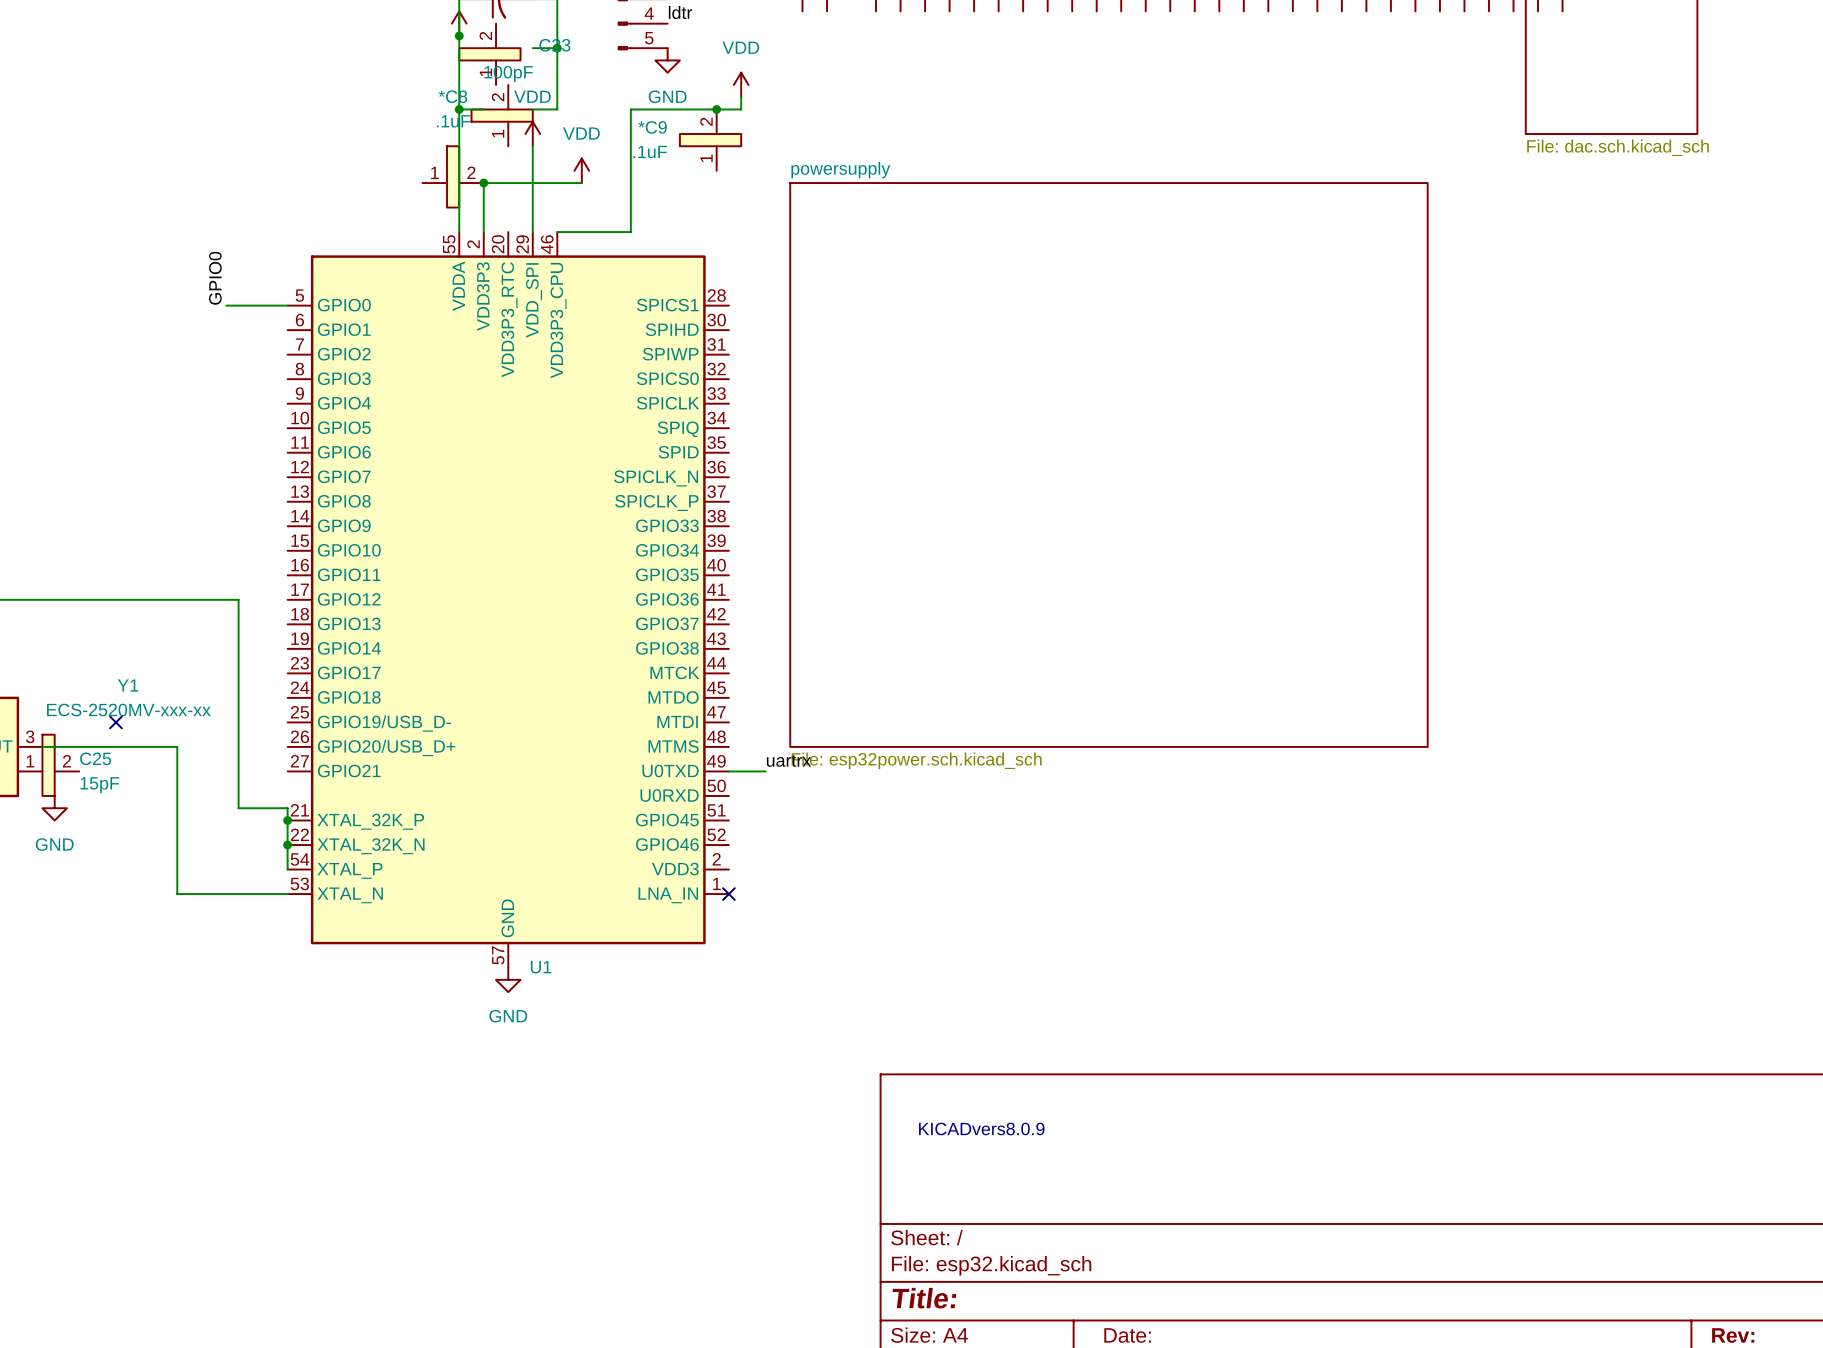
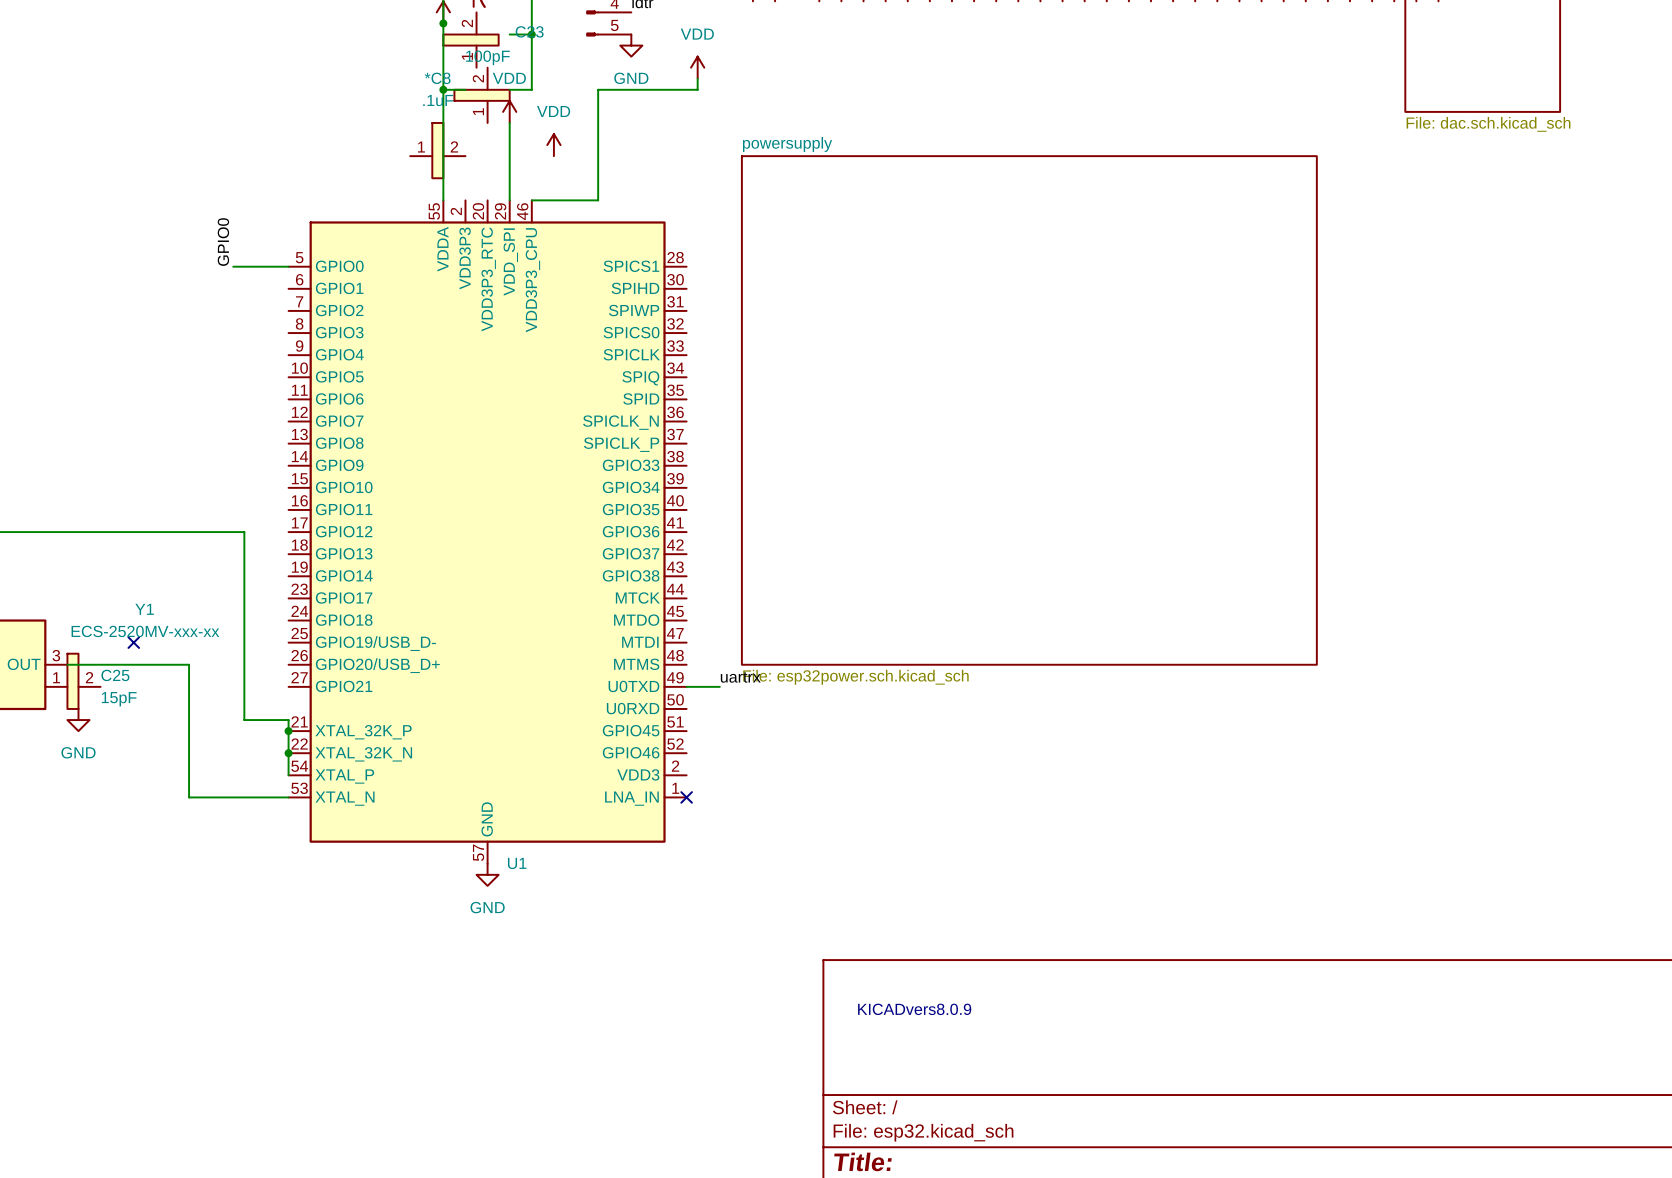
junction: (716, 109) -> none
*C9: .1uF (710, 140) -> none
junction: (483, 183) -> none
wire: (581, 183) (483, 183) (483, 232) -> none

